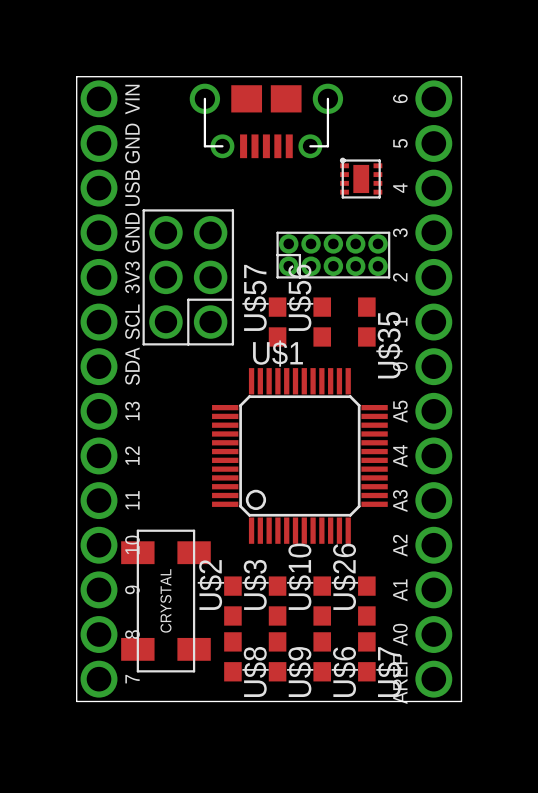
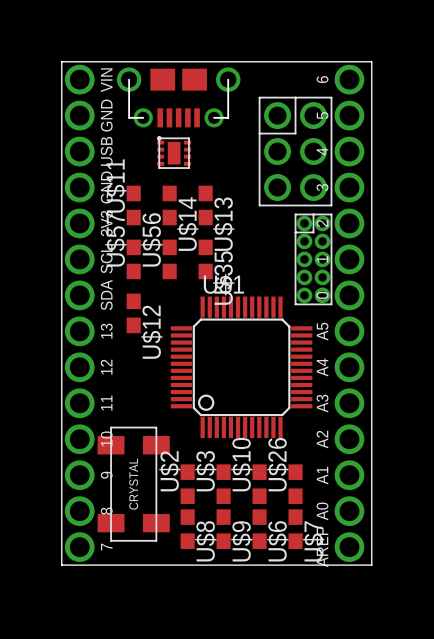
part position: (266, 120) -> (178, 97)
part footprint: [339, 157, 383, 199] -> [258, 96, 333, 207]
part: none -> (174, 152)
U$11: none -> (133, 205)
U$14: none -> (169, 205)
U$13: none -> (205, 205)
part rotation: 0° (333, 255) -> 90° clockwise (313, 259)
part position: (333, 255) -> (313, 259)
part: (188, 277) -> none
U$57 position: (277, 322) -> (133, 259)
U$56 position: (322, 322) -> (169, 259)
U$35 position: (366, 322) -> (205, 259)
U$12: none -> (133, 313)

